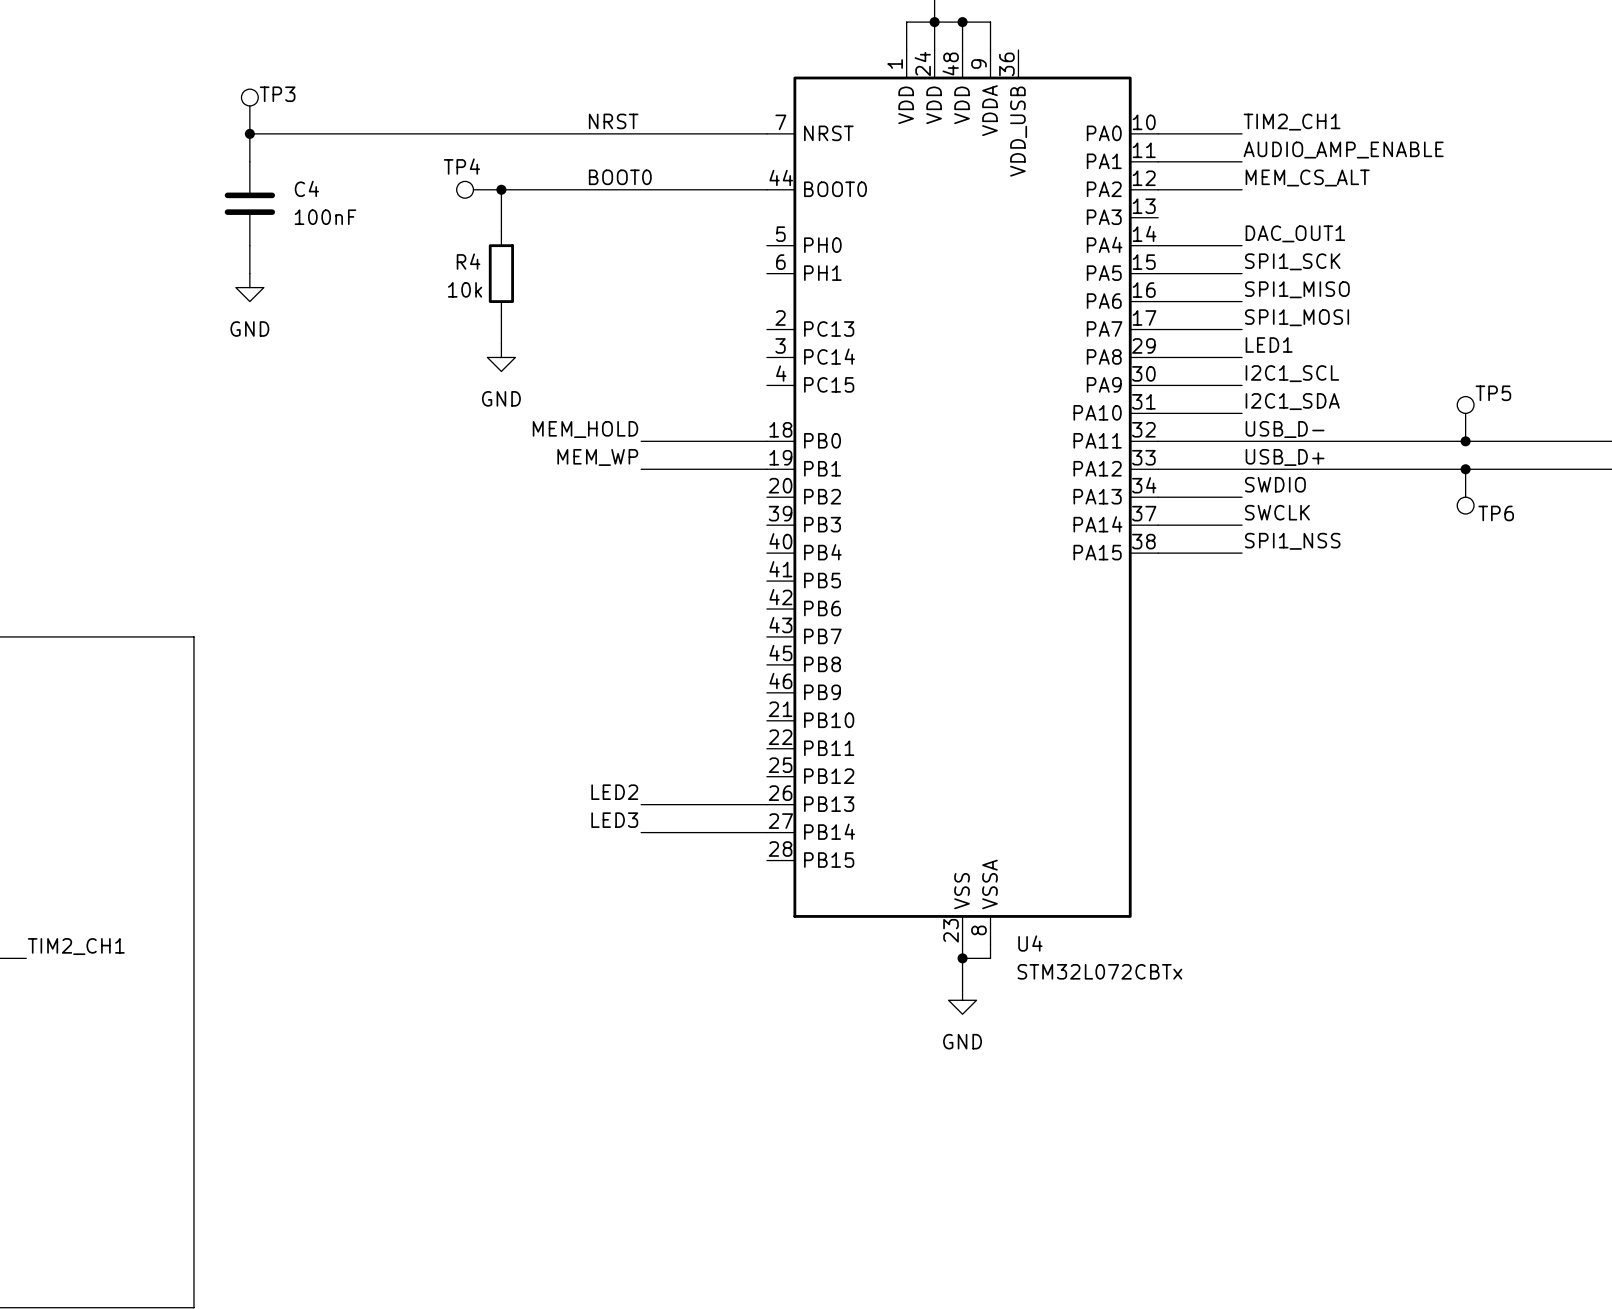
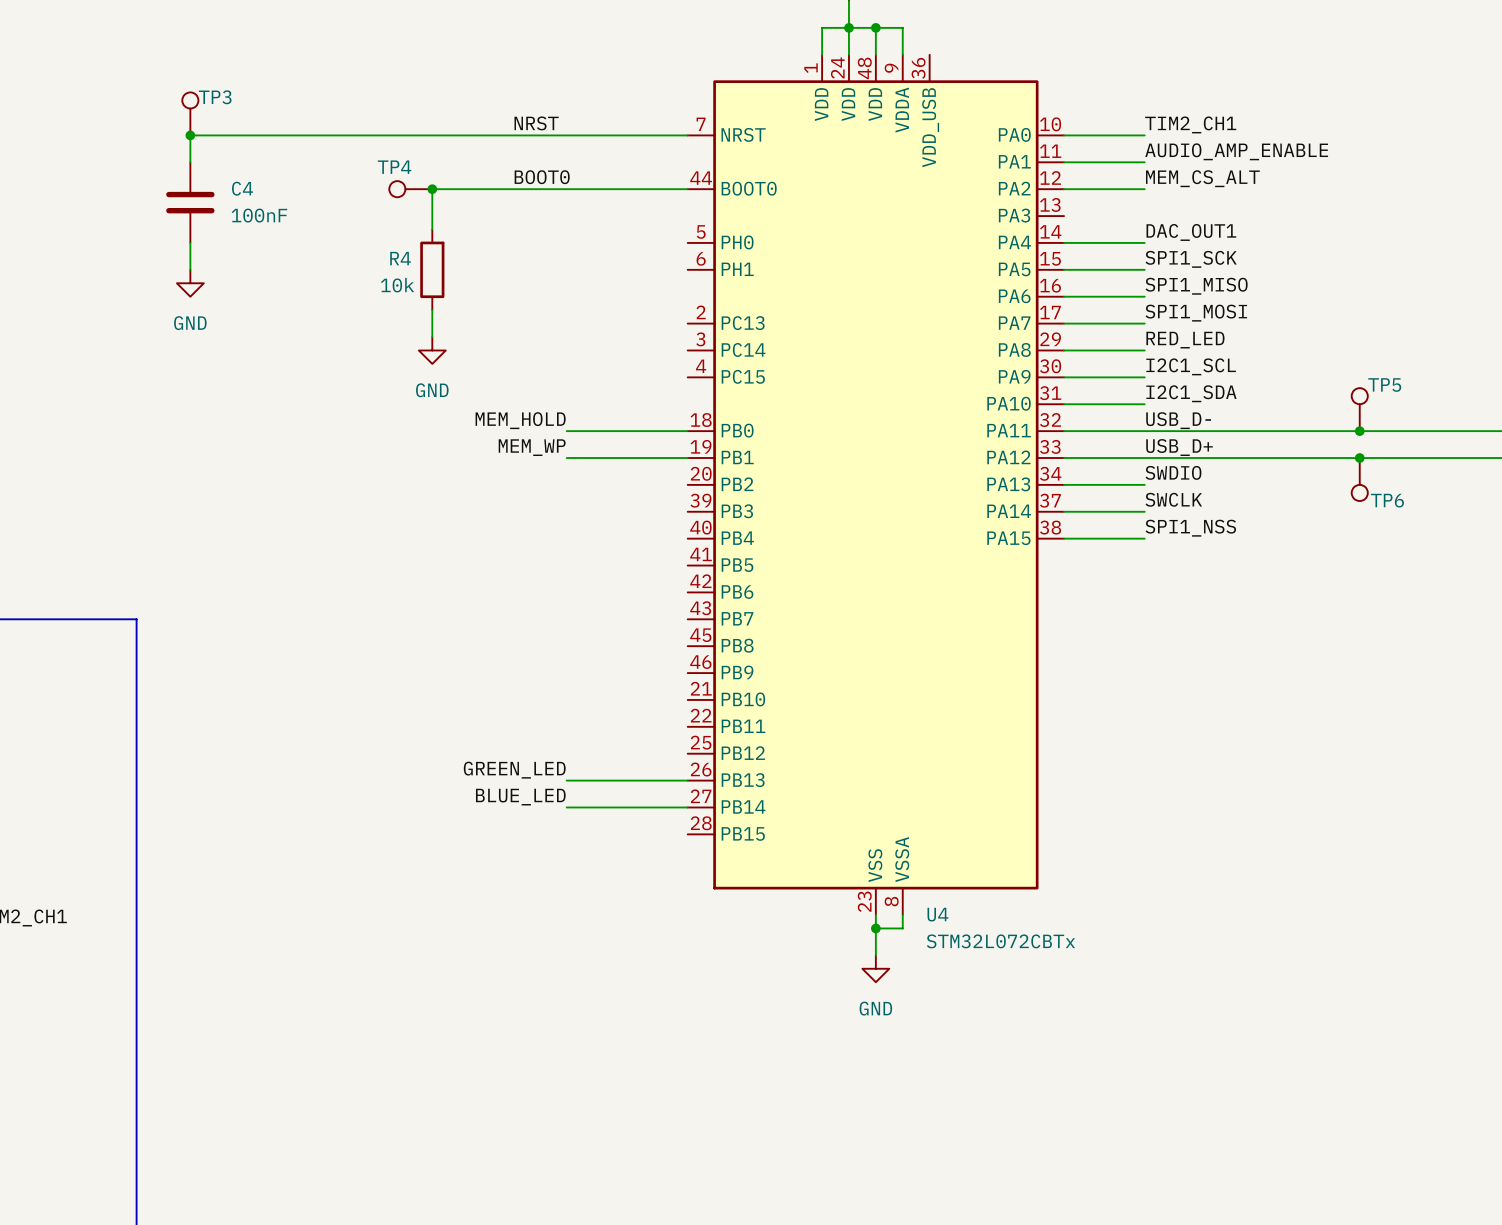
label: LED1 (1269, 345) -> RED_LED (1185, 340)
label: LED2 (614, 792) -> GREEN_LED (514, 770)
label: LED3 (614, 820) -> BLUE_LED (520, 797)

